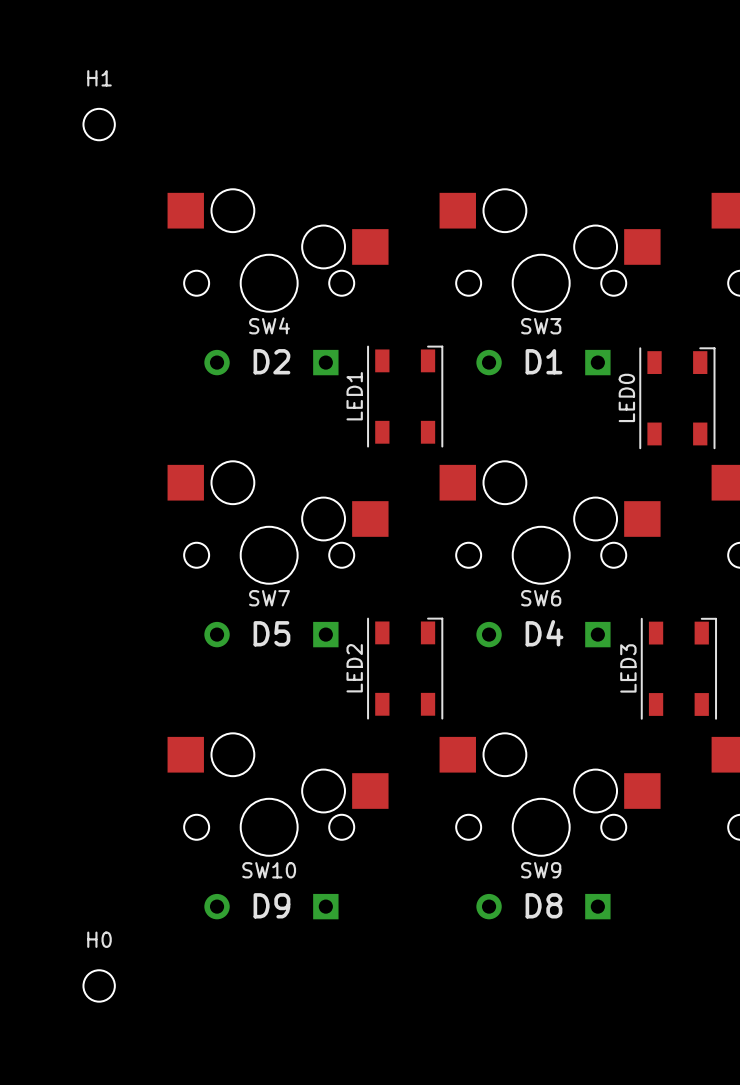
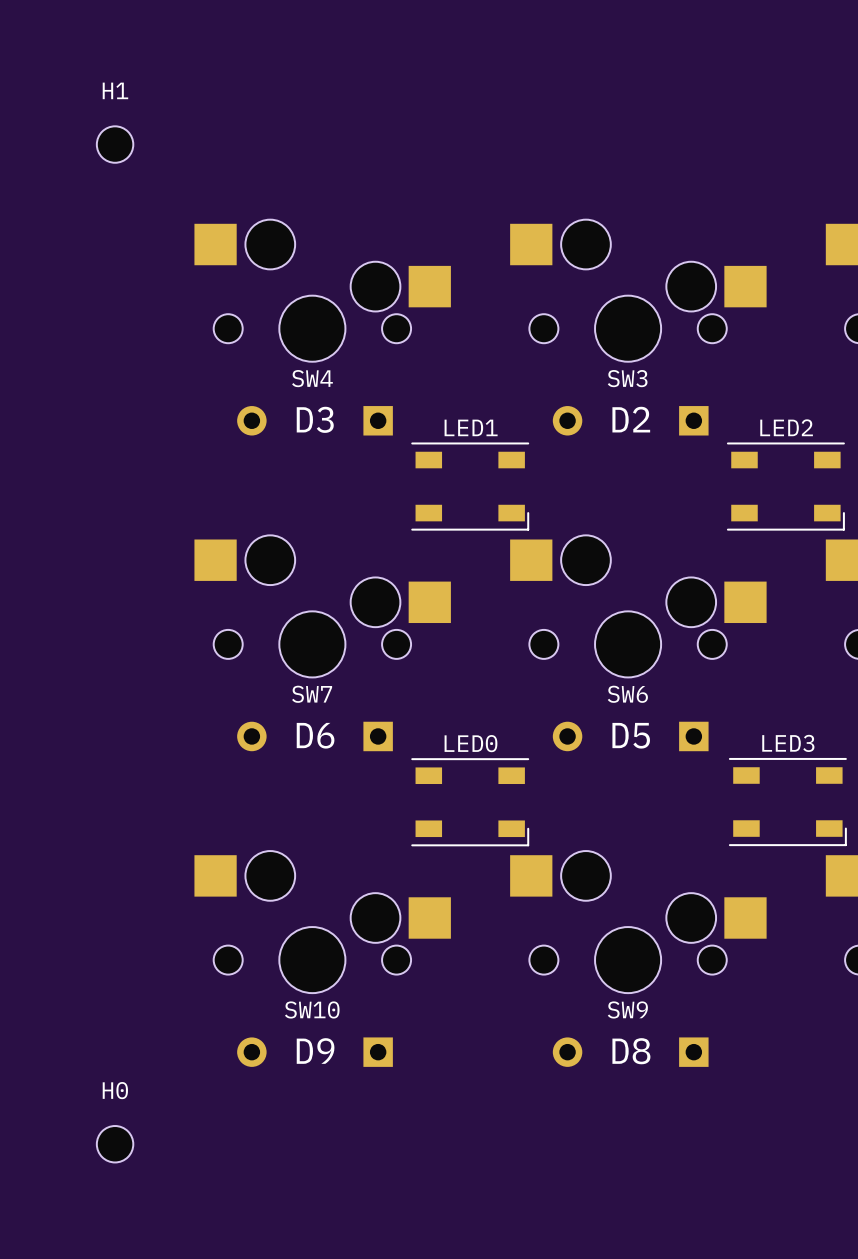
D2 name: D2 (271, 361) -> D3 (315, 419)
D1 name: D1 (543, 361) -> D2 (631, 419)
LED1 rotation: 0° (405, 396) -> 90° clockwise (470, 486)
LED0 rotation: 0° (677, 398) -> 90° clockwise (470, 802)
LED0 position: (677, 398) -> (470, 802)
D5 name: D5 (271, 633) -> D6 (315, 735)
D4 name: D4 (544, 633) -> D5 (631, 735)
LED2 rotation: 0° (405, 668) -> 90° clockwise (785, 486)
LED2 position: (405, 668) -> (785, 486)
LED3 rotation: 0° (678, 668) -> 90° clockwise (787, 802)

